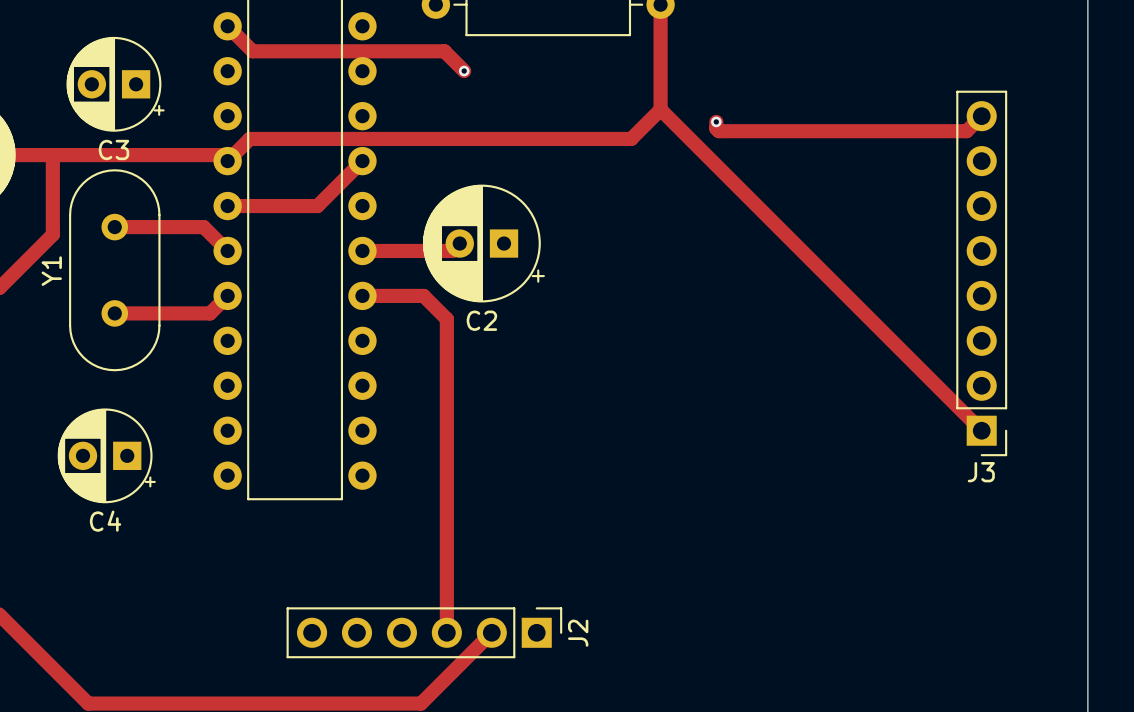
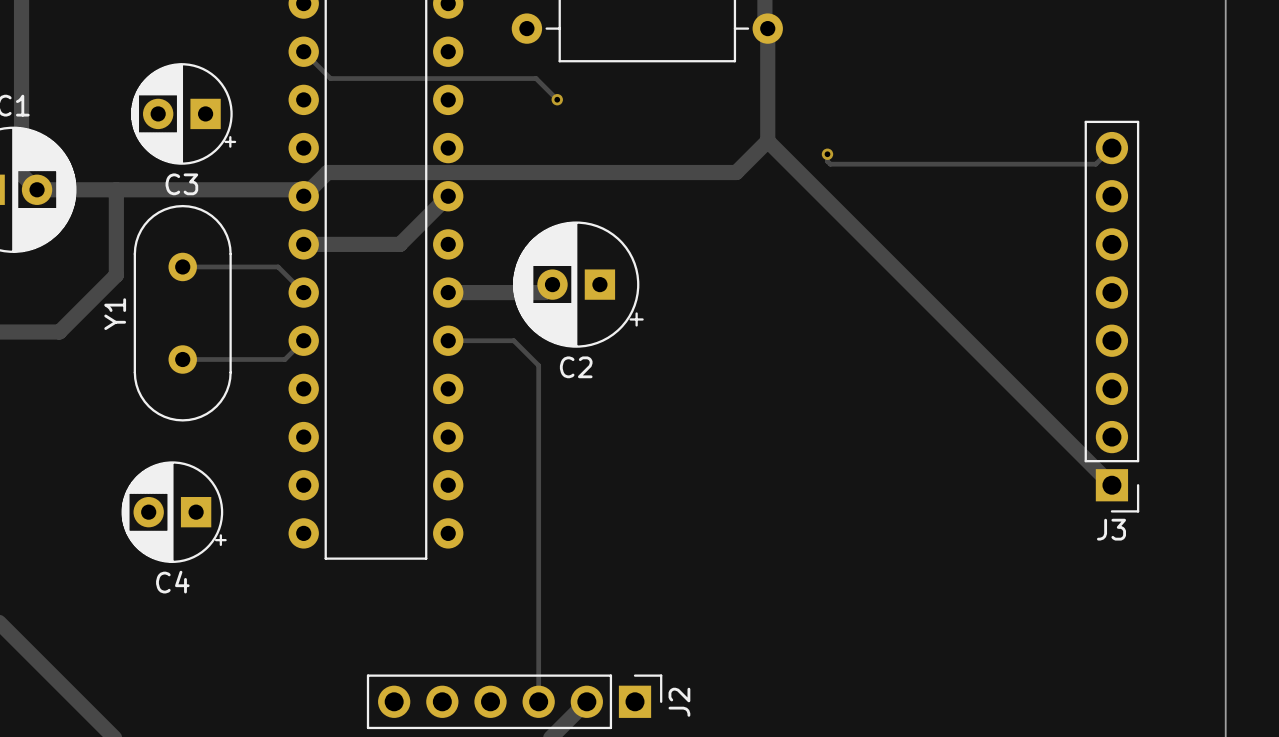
track width: thick (227, 26) (252, 51) (444, 51) (464, 71) -> thin (303, 51) (330, 78) (536, 78) (557, 99)
track width: thick (981, 116) (966, 131) (718, 131) (716, 128) (716, 121) -> thin (1111, 148) (1095, 164) (830, 164) (827, 161) (827, 154)
track width: thick (114, 227) (203, 227) (227, 250) -> thin (182, 266) (278, 266) (303, 292)
track width: thick (227, 295) (210, 313) (114, 313) -> thin (303, 340) (284, 359) (182, 359)
track width: thick (362, 295) (423, 295) (446, 319) (446, 632) -> thin (448, 340) (513, 340) (538, 365) (538, 701)

